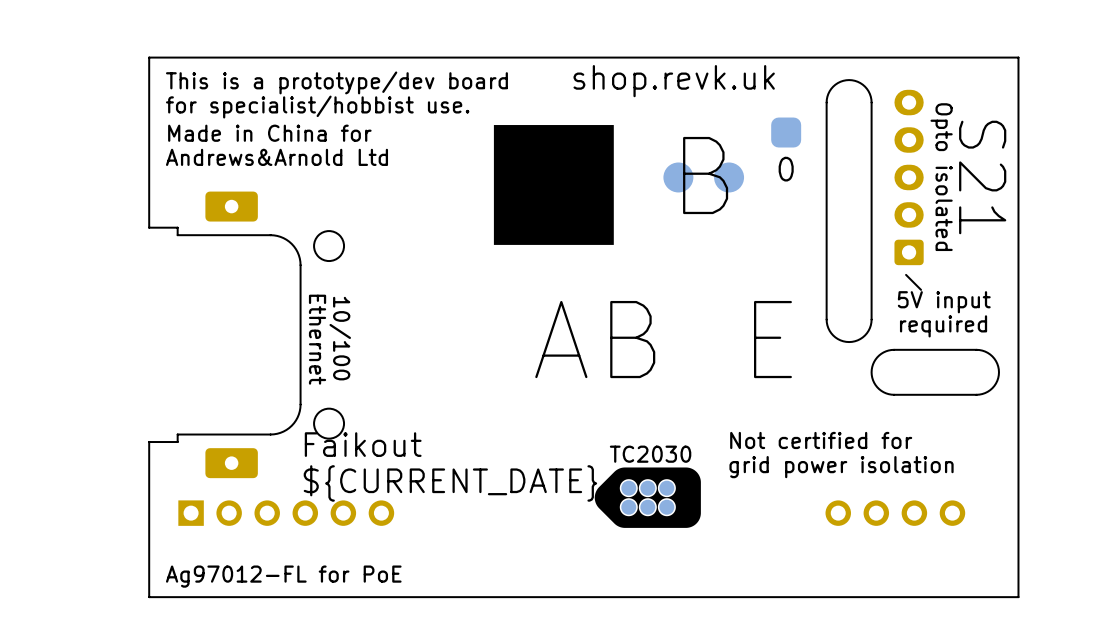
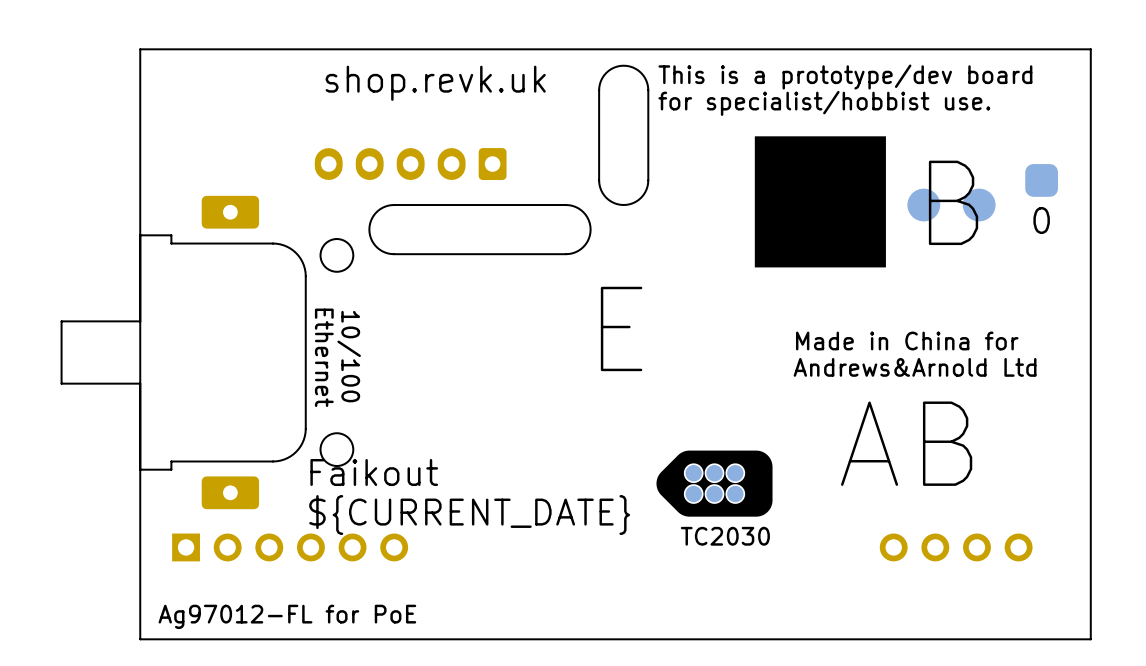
text position: shop.revk.uk (674, 81) -> shop.revk.uk (435, 83)
text: This is a prototype/dev board (336, 82) -> none
text: none -> This is a prototype/dev board (845, 77)
board edge: none -> (648, 90) (647, 186) (643, 195) (636, 201) (626, 204) (617, 204) (604, 195) (599, 183) (599, 83) (608, 70) (617, 66) (626, 65) (636, 69) (643, 75) (648, 90)
board edge: (871, 102) (871, 322) (868, 330) (862, 337) (854, 341) (846, 341) (833, 335) (826, 322) (826, 99) (829, 91) (835, 84) (843, 80) (852, 80) (865, 86) (869, 93) (871, 102) -> none
text: for specialist/hobbist use. (317, 107) -> none
text: none -> for specialist/hobbist use. (824, 103)
part position: (786, 132) -> (1041, 180)
text: Made in China for (269, 133) -> none
text: Andrews&Arnold Ltd (276, 157) -> none
part: none -> (410, 164)
text position: 0 (786, 169) -> 0 (1041, 220)
part position: (703, 177) -> (951, 205)
part: (909, 177) -> none
text: Opto isolated (941, 177) -> none
text: S21 (982, 177) -> none
drawing position: (553, 184) -> (820, 201)
board edge: none -> (566, 205) (390, 205) (382, 207) (375, 213) (370, 220) (369, 232) (375, 245) (382, 251) (390, 254) (569, 253) (578, 250) (585, 244) (589, 235) (590, 226) (587, 217) (581, 210) (566, 205)
board edge: none -> (140, 235) (140, 469)
line: (906, 274) (921, 289) -> none
text: 5V input (944, 302) -> none
text: none -> Made in China for (907, 341)
text: required (943, 326) -> none
part: none -> (207, 352)
part: (246, 334) -> none
text position: AB (595, 339) -> AB (906, 443)
text position: E (772, 339) -> E (621, 328)
text: none -> Andrews&Arnold Ltd (915, 367)
board edge: (976, 349) (888, 350) (879, 355) (874, 361) (872, 377) (879, 389) (891, 394) (982, 394) (994, 386) (998, 378) (998, 369) (992, 356) (985, 351) (976, 349) -> none
text: Not certified for (821, 440) -> none
text position: TC2030 (650, 454) -> TC2030 (725, 536)
text: grid power isolation (841, 467) -> none
part position: (647, 497) -> (714, 483)

